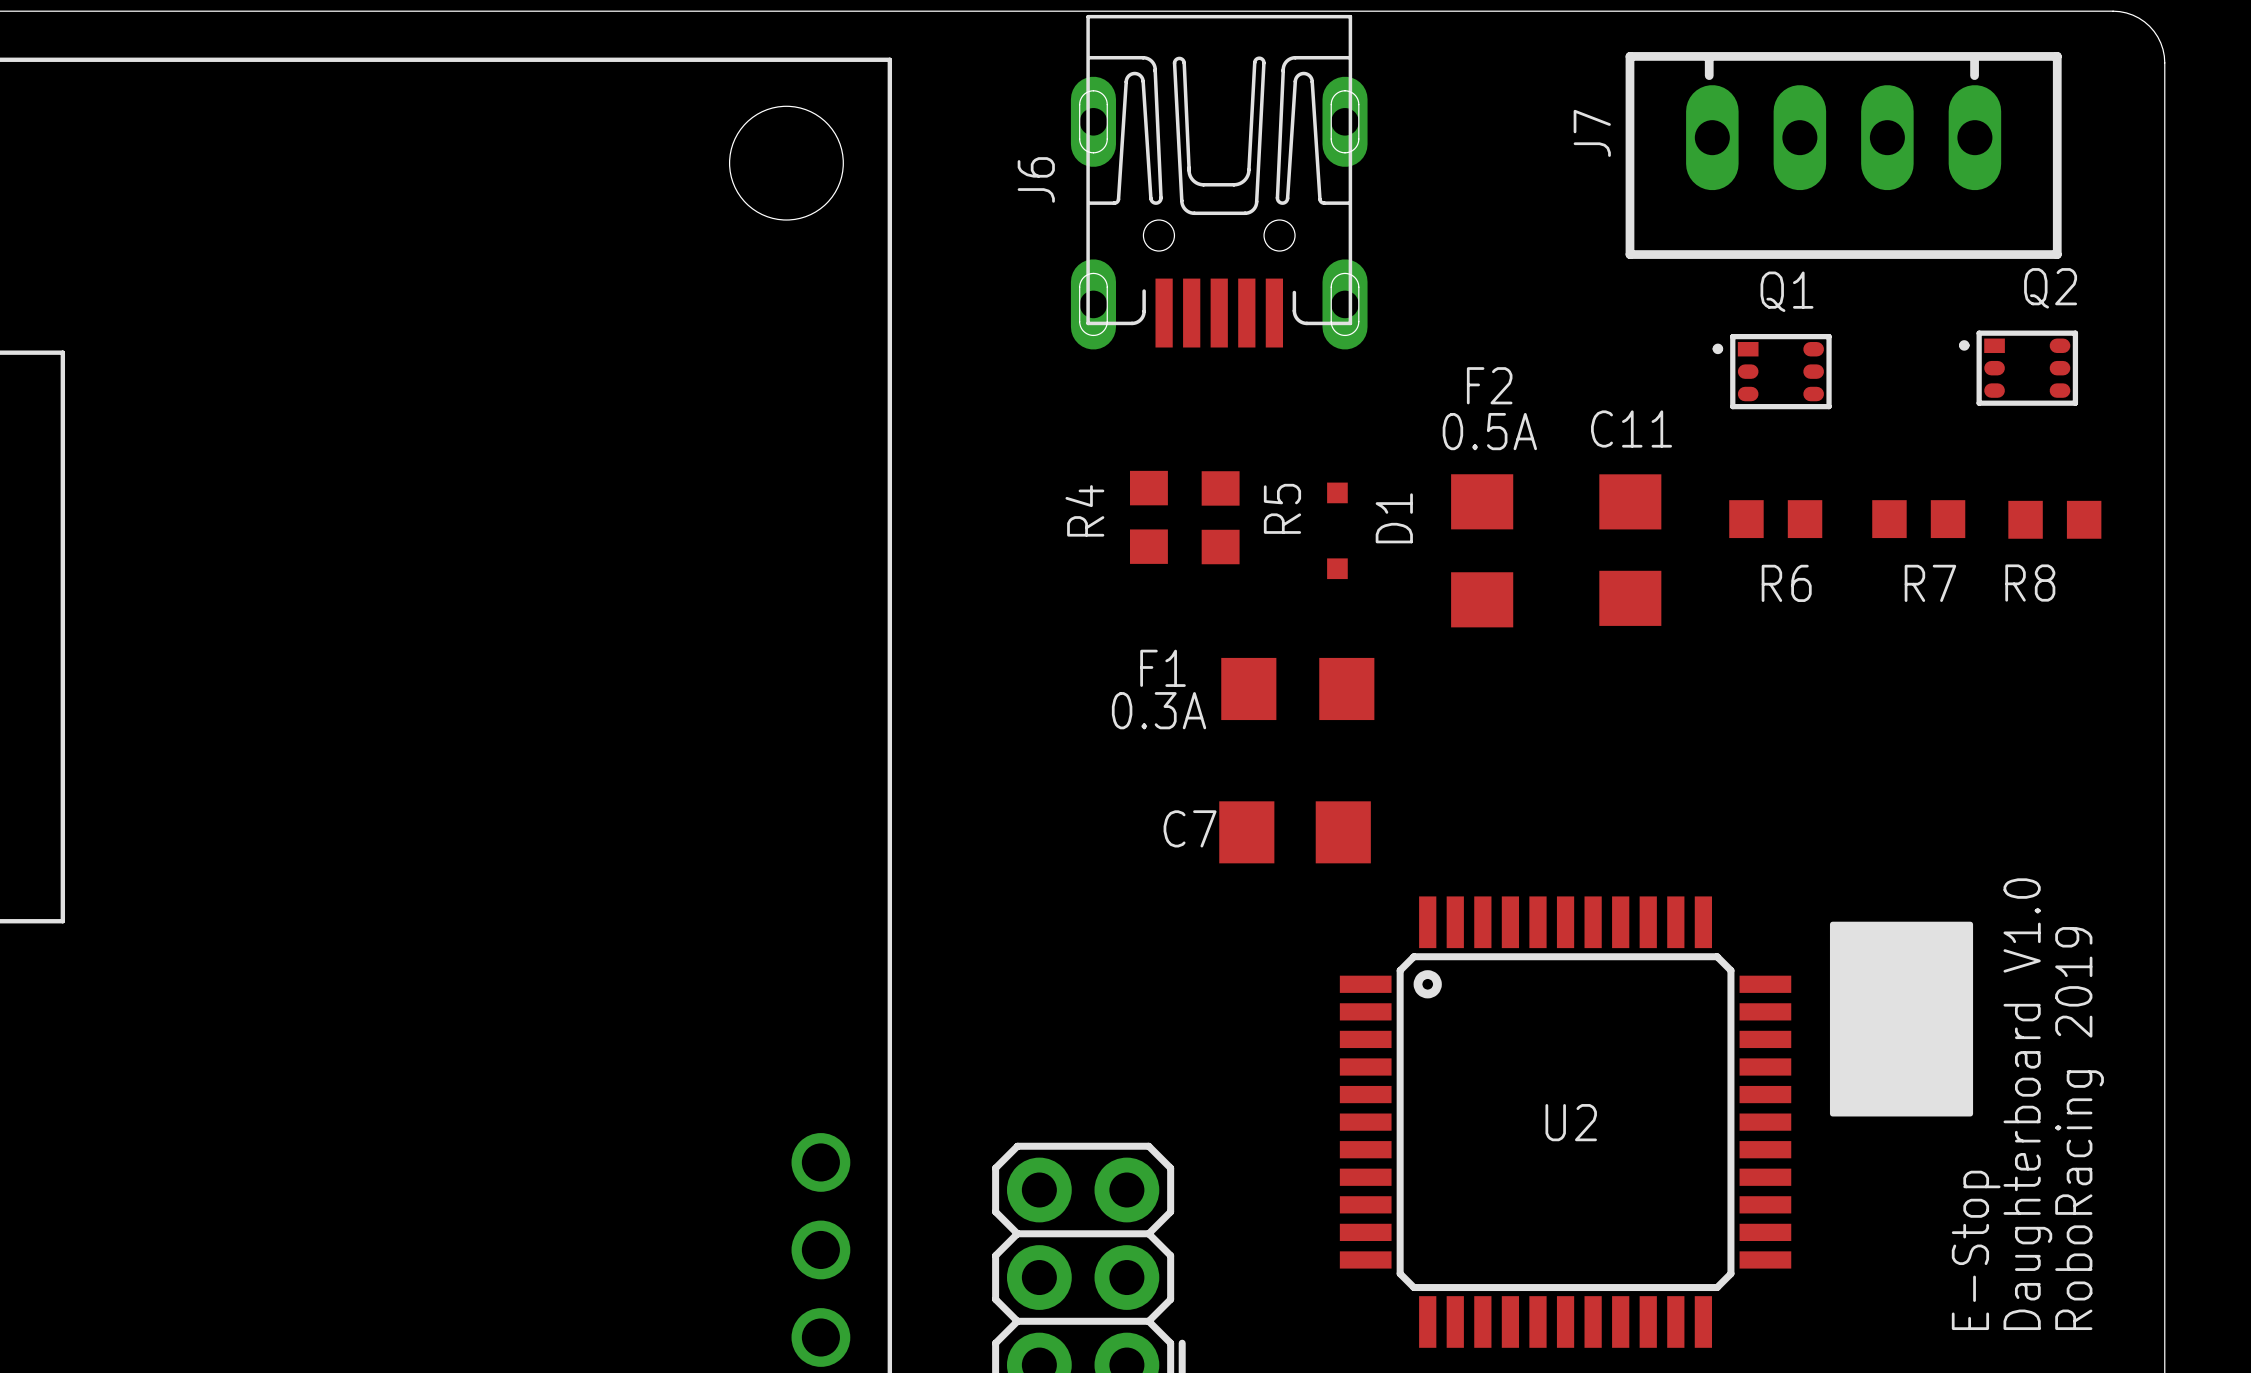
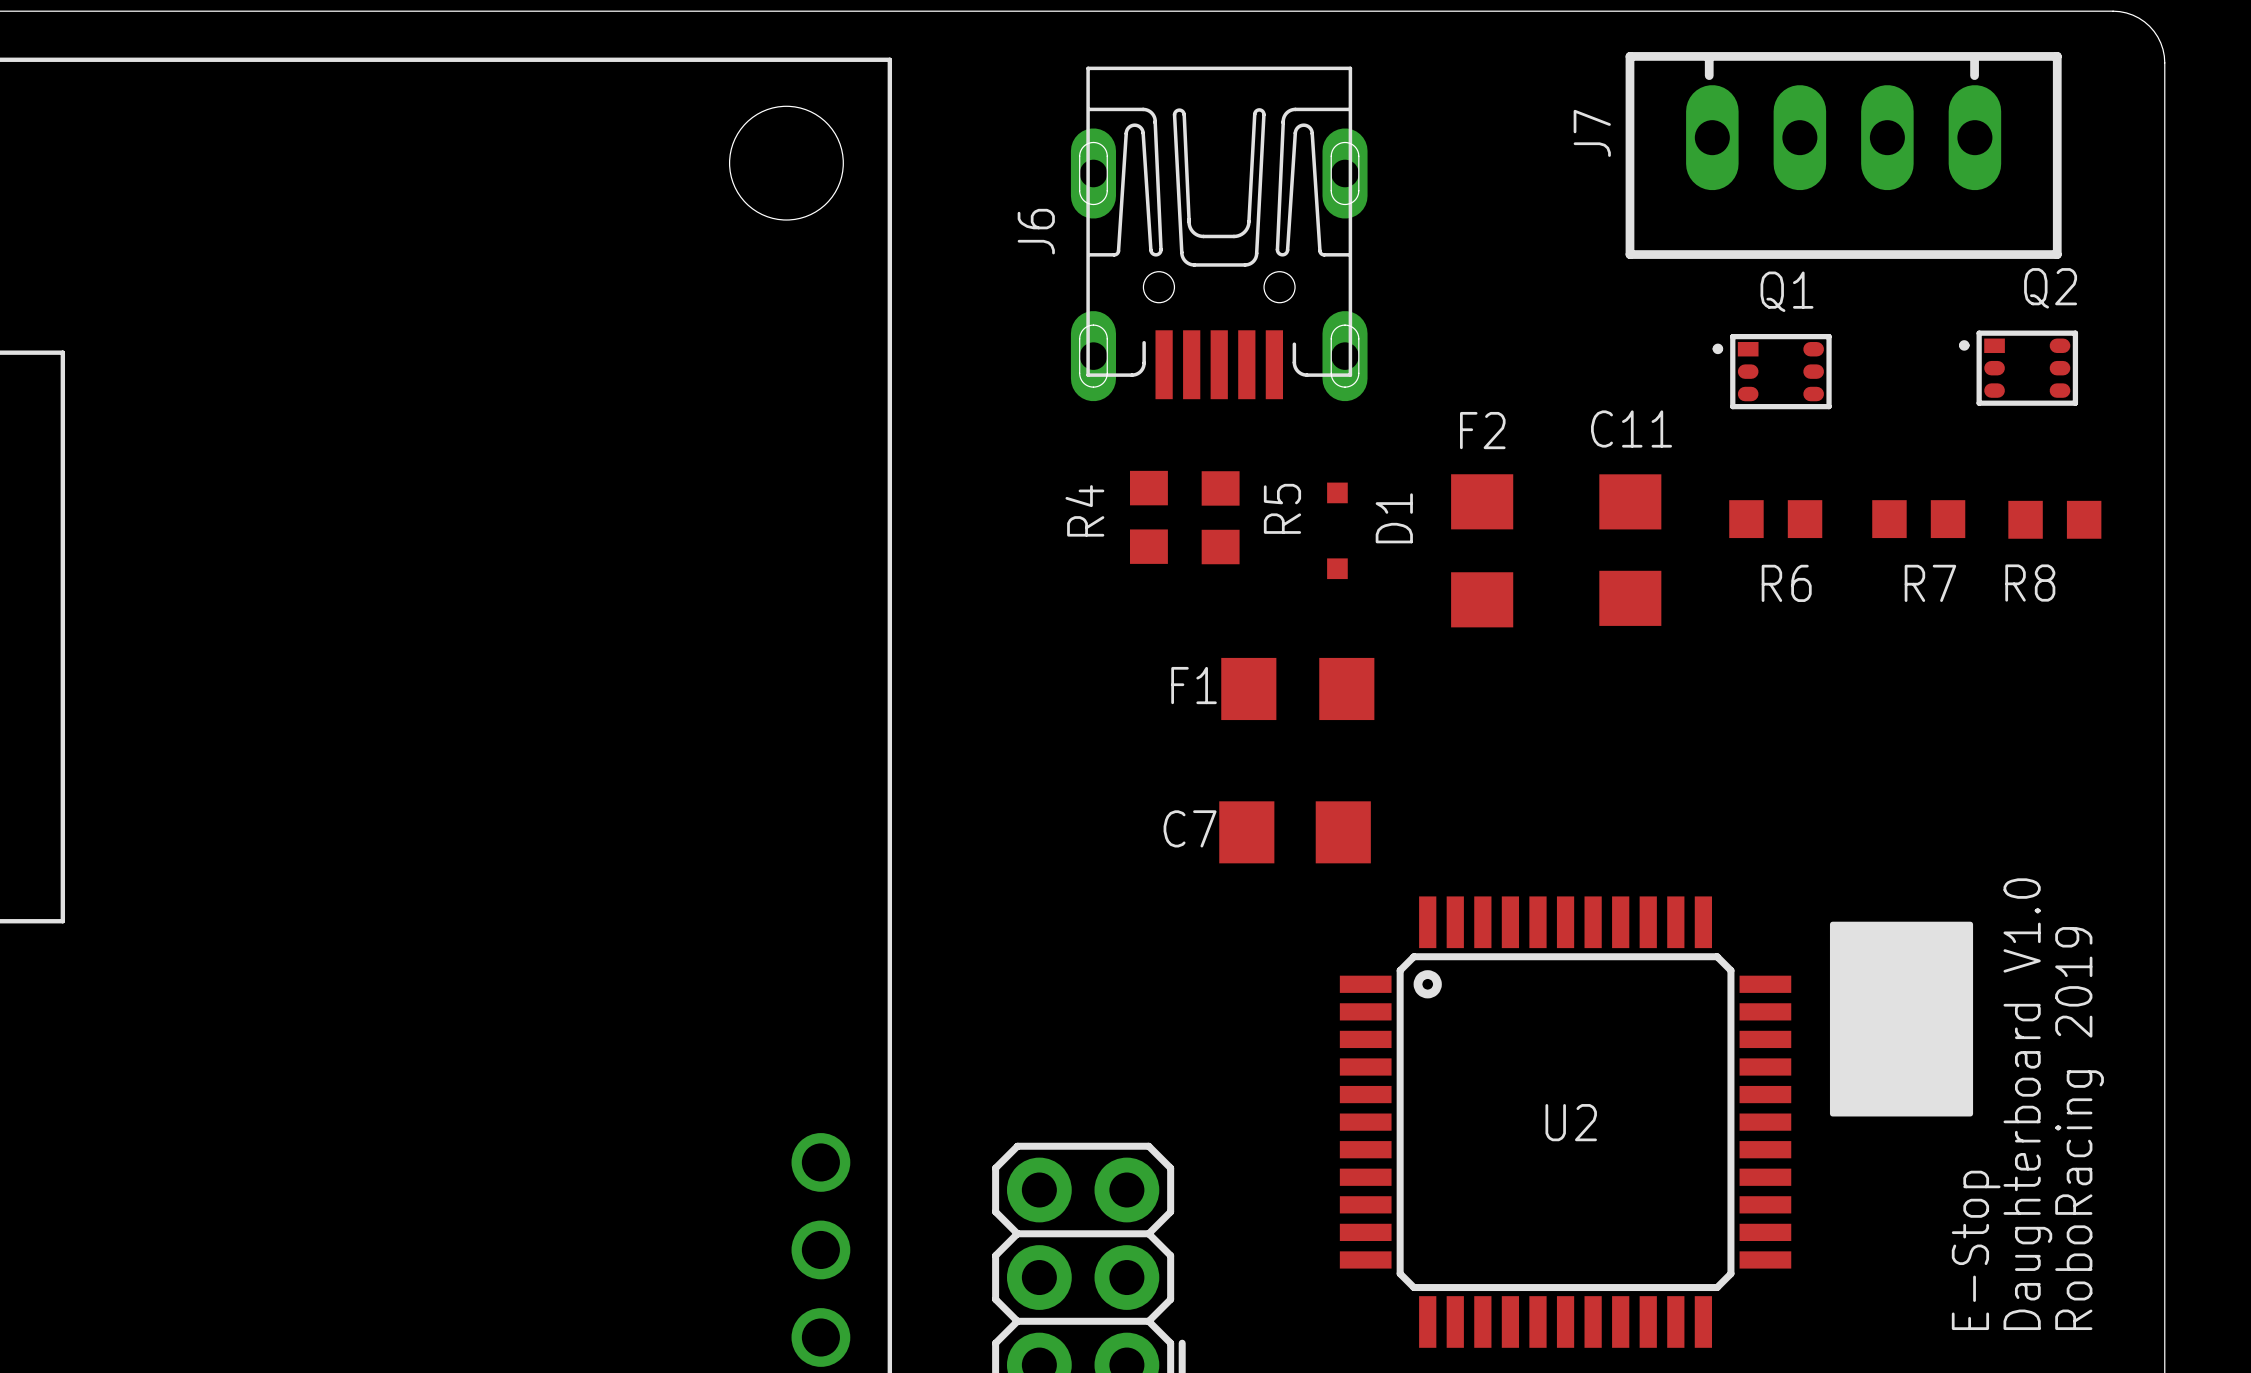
J6 position: (1219, 182) -> (1219, 233)
F2 name position: F2 (1489, 385) -> F2 (1482, 430)
text: 0.5A (1489, 431) -> none
F1 name position: F1 (1163, 668) -> F1 (1194, 685)
text: 0.3A (1159, 710) -> none

